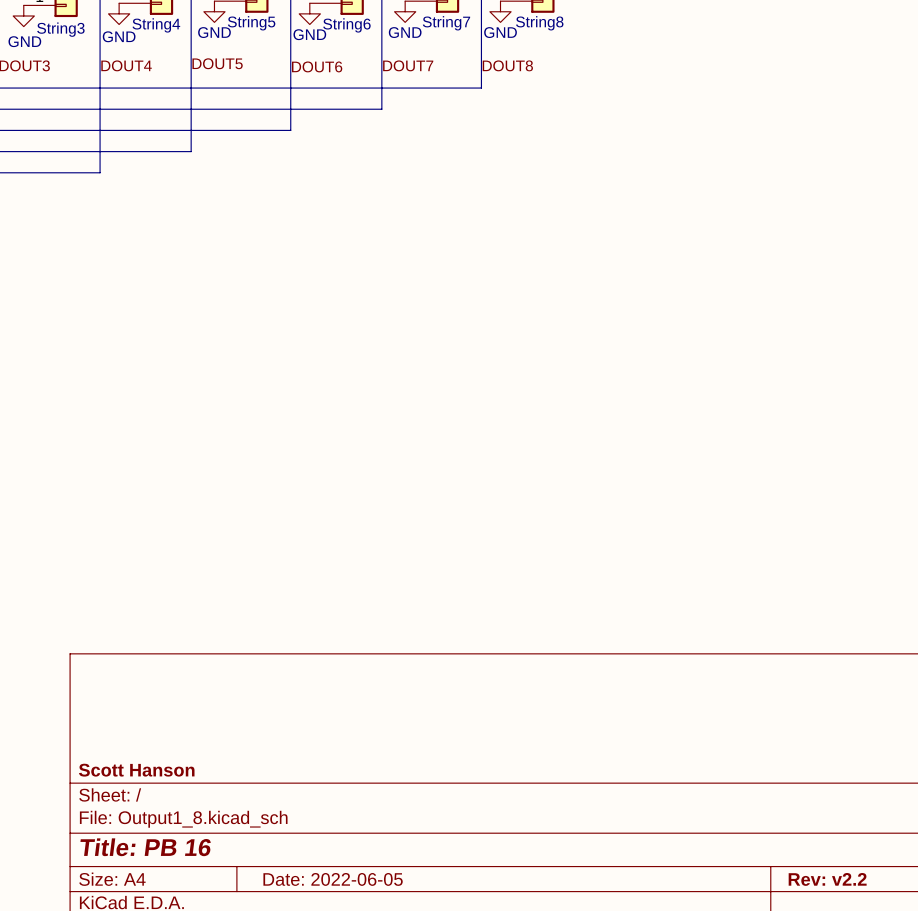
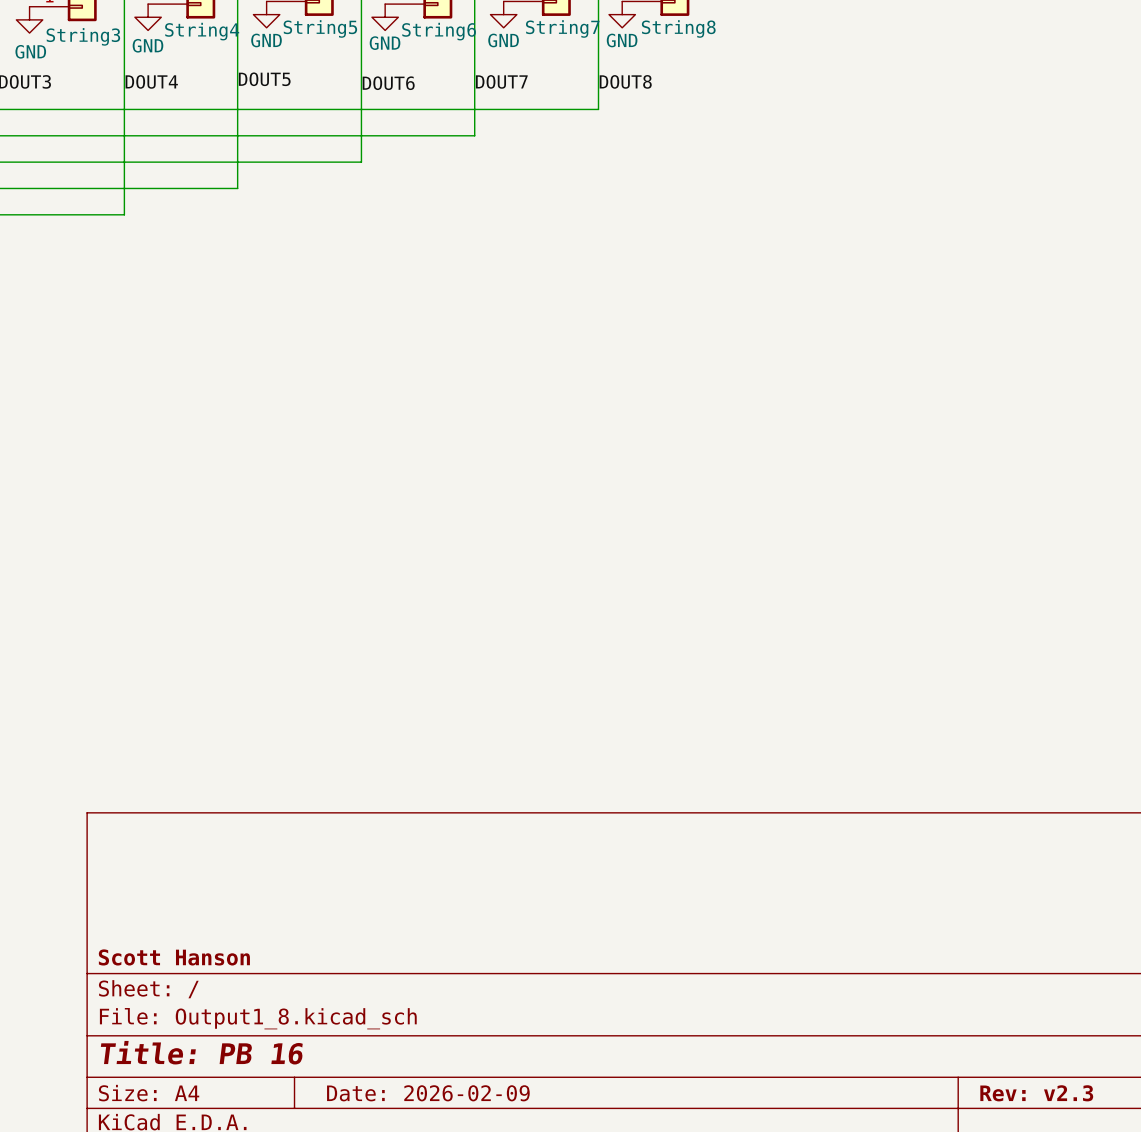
title block: Date: 2022-06-05 (333, 879) -> Date: 2026-02-09 (428, 1093)
title block: Rev: v2.2 (827, 879) -> Rev: v2.3 (1036, 1093)

